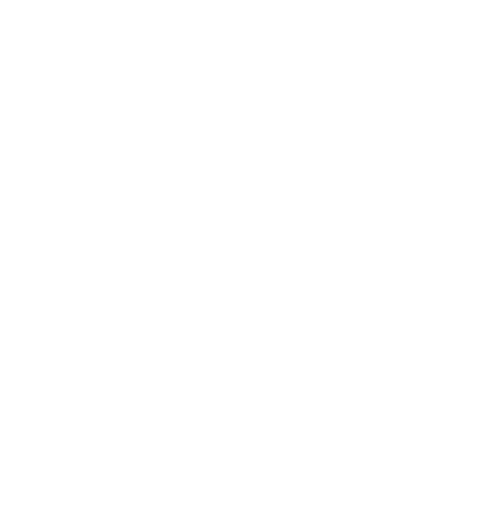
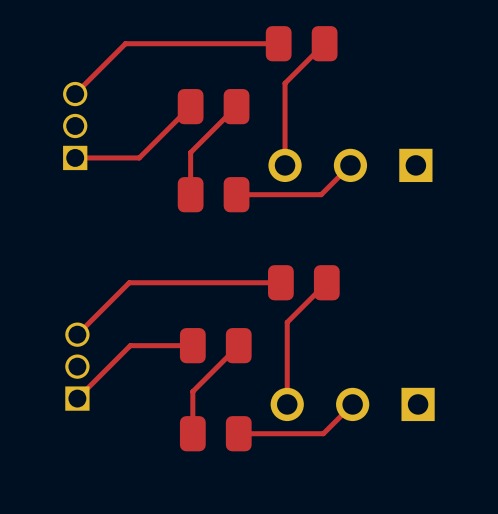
top track: none -> (278, 43) (125, 43) (75, 94)
part: none -> (301, 43)
top track: none -> (324, 43) (285, 83) (285, 165)
top track: none -> (190, 106) (139, 157) (75, 157)
part: none -> (213, 106)
top track: none -> (236, 106) (190, 152) (190, 194)
part: none -> (75, 125)
top track: none -> (350, 165) (321, 194) (236, 194)
part: none -> (350, 165)
part: none -> (213, 194)
top track: none -> (280, 282) (129, 282) (77, 334)
part: none -> (303, 282)
top track: none -> (326, 282) (287, 322) (287, 404)
top track: none -> (192, 345) (130, 345) (77, 398)
part: none -> (215, 345)
top track: none -> (238, 345) (192, 391) (192, 433)
part: none -> (77, 366)
top track: none -> (352, 404) (323, 433) (238, 433)
part: none -> (352, 404)
part: none -> (215, 433)

